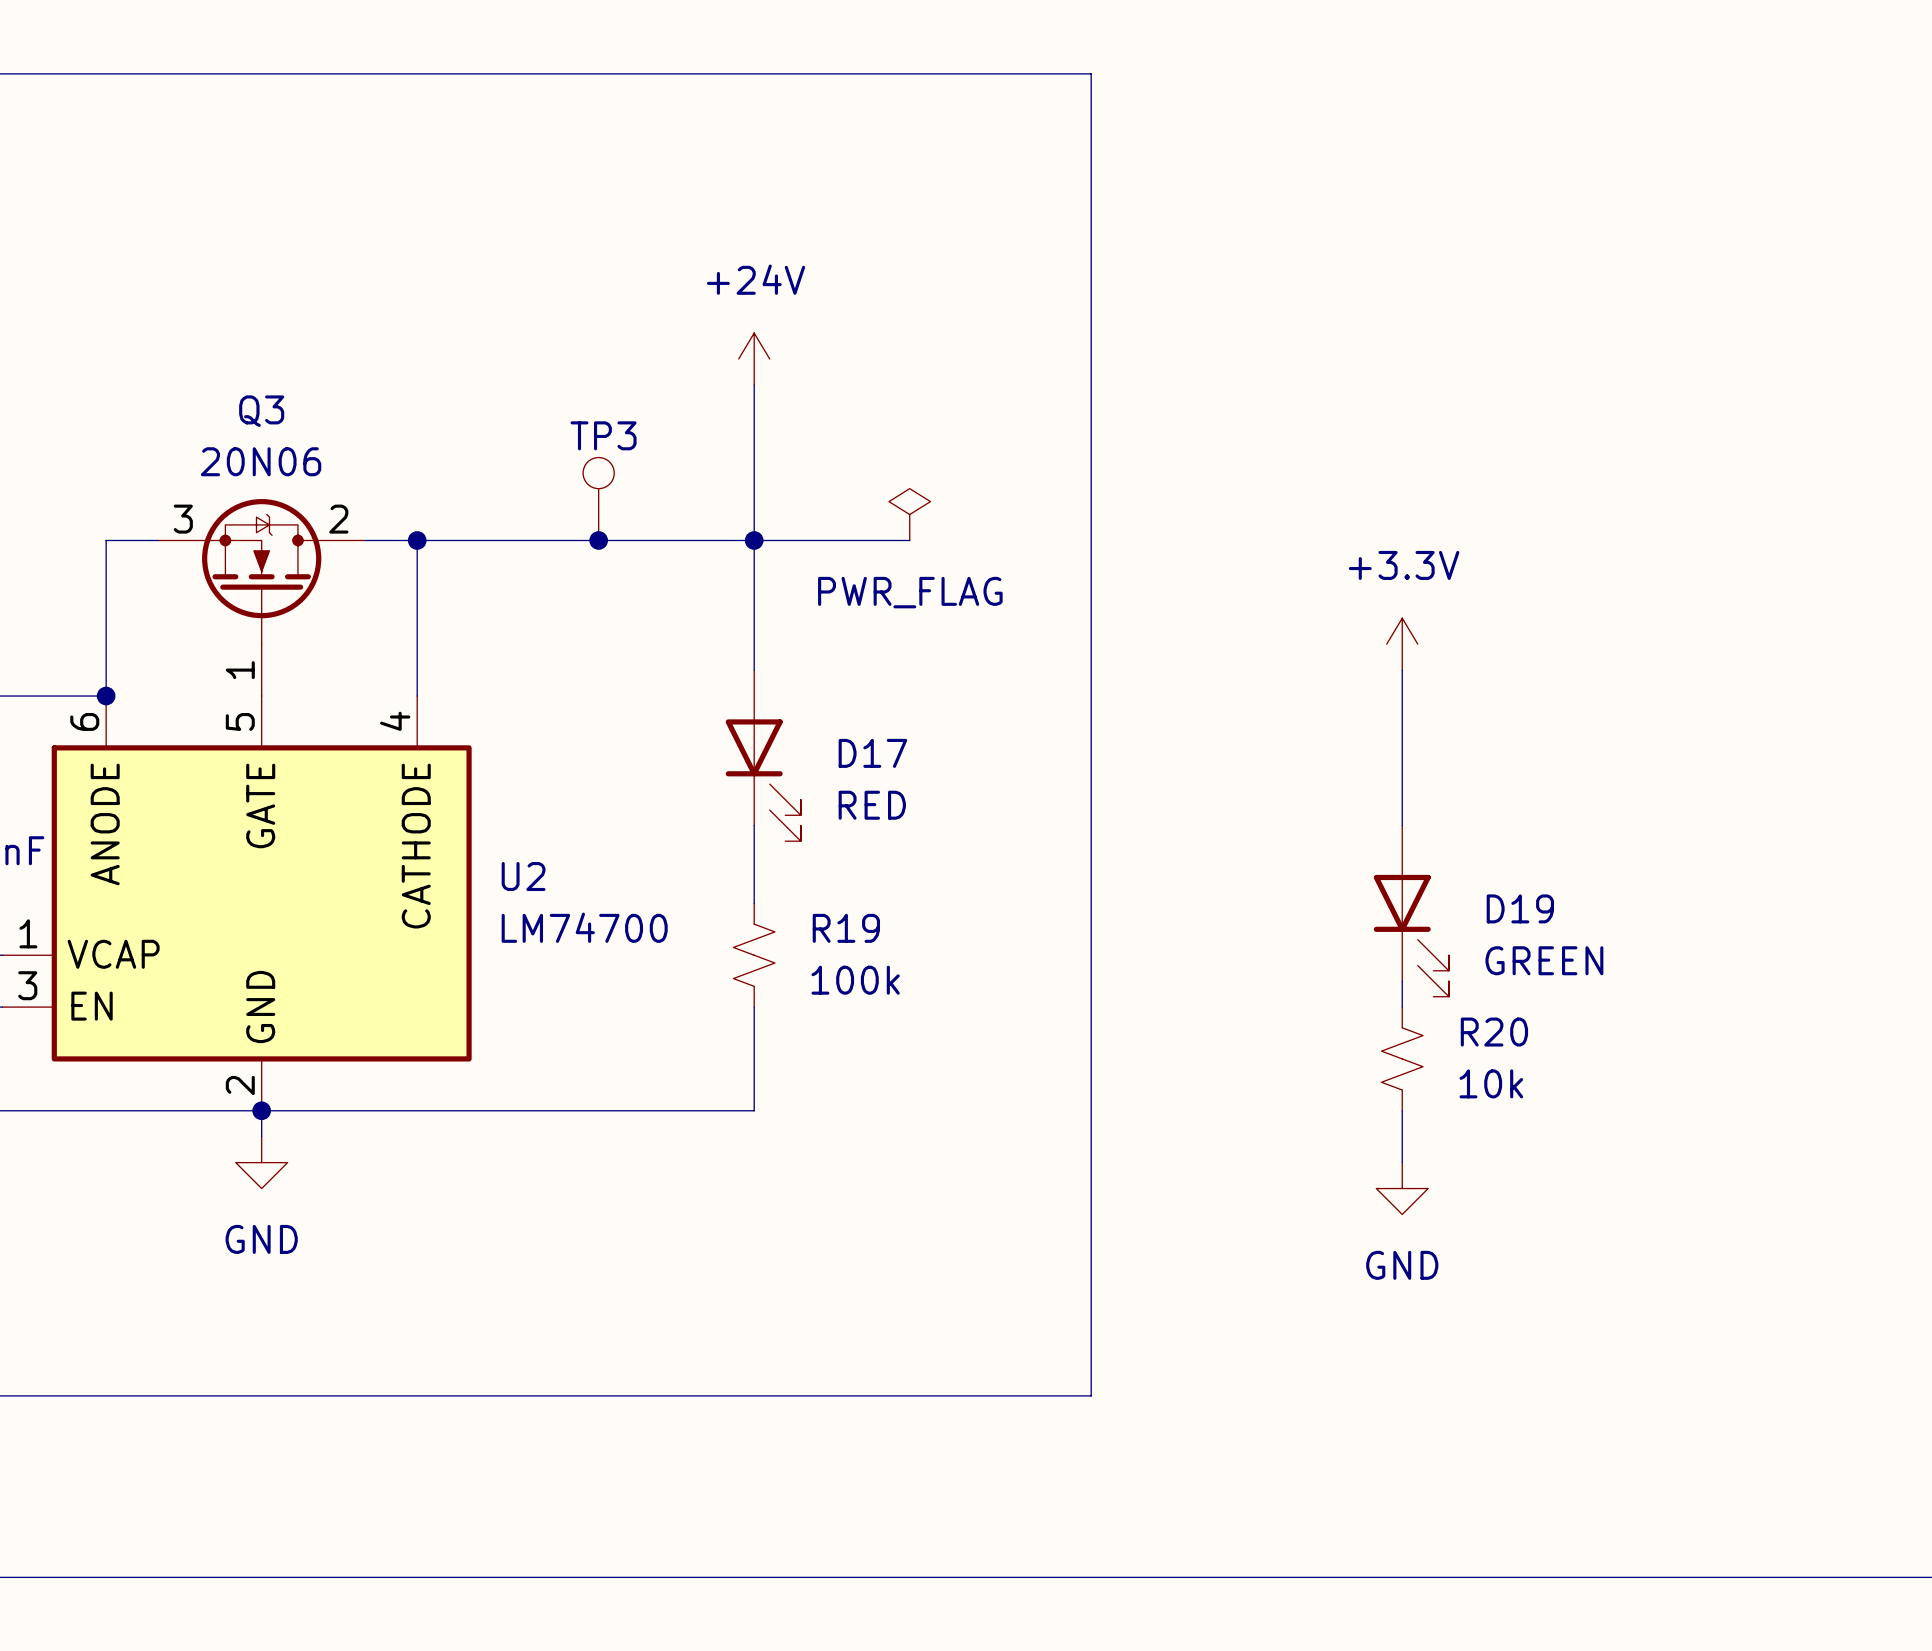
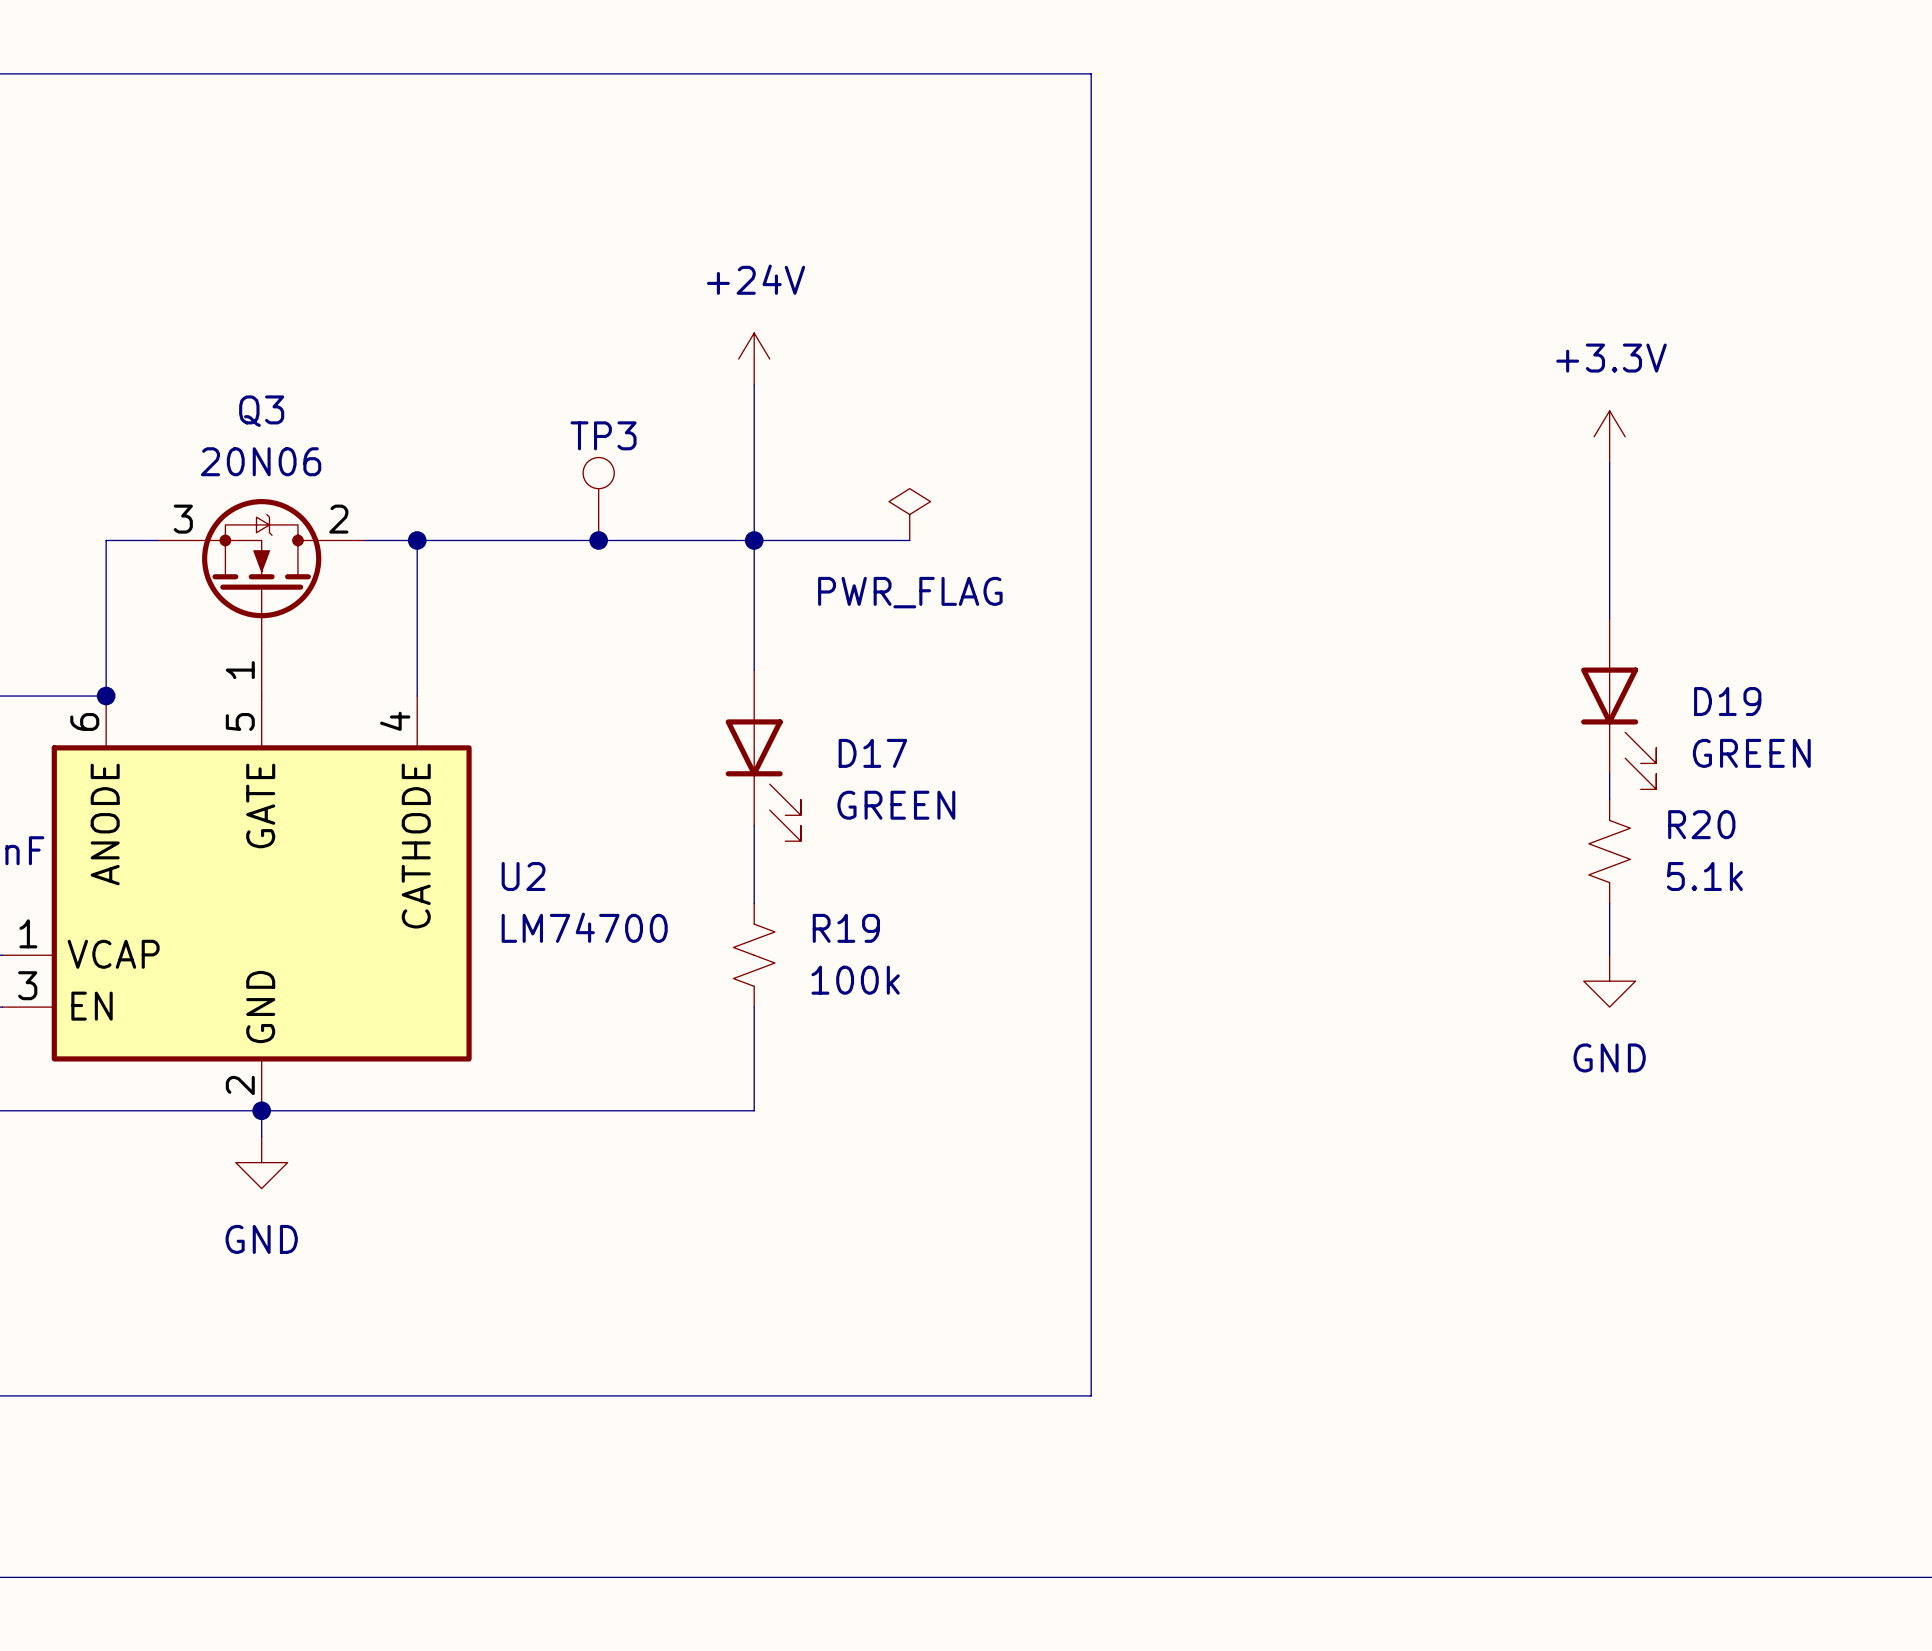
power symbol position: +3.3V (1402, 644) -> +3.3V (1609, 436)
wire: (1402, 670) (1402, 825) -> (1609, 462) (1609, 618)
D17 value: RED (872, 805) -> GREEN (896, 805)
D19 position: (1411, 911) -> (1618, 703)
wire: (1402, 981) (1402, 1007) -> (1609, 773) (1609, 799)
R20 position: (1402, 1058) -> (1609, 851)
R20 value: 10k (1491, 1083) -> 5.1k (1704, 876)
wire: (1402, 1110) (1402, 1162) -> (1609, 903) (1609, 955)
power symbol position: GND (1402, 1188) -> GND (1609, 981)

